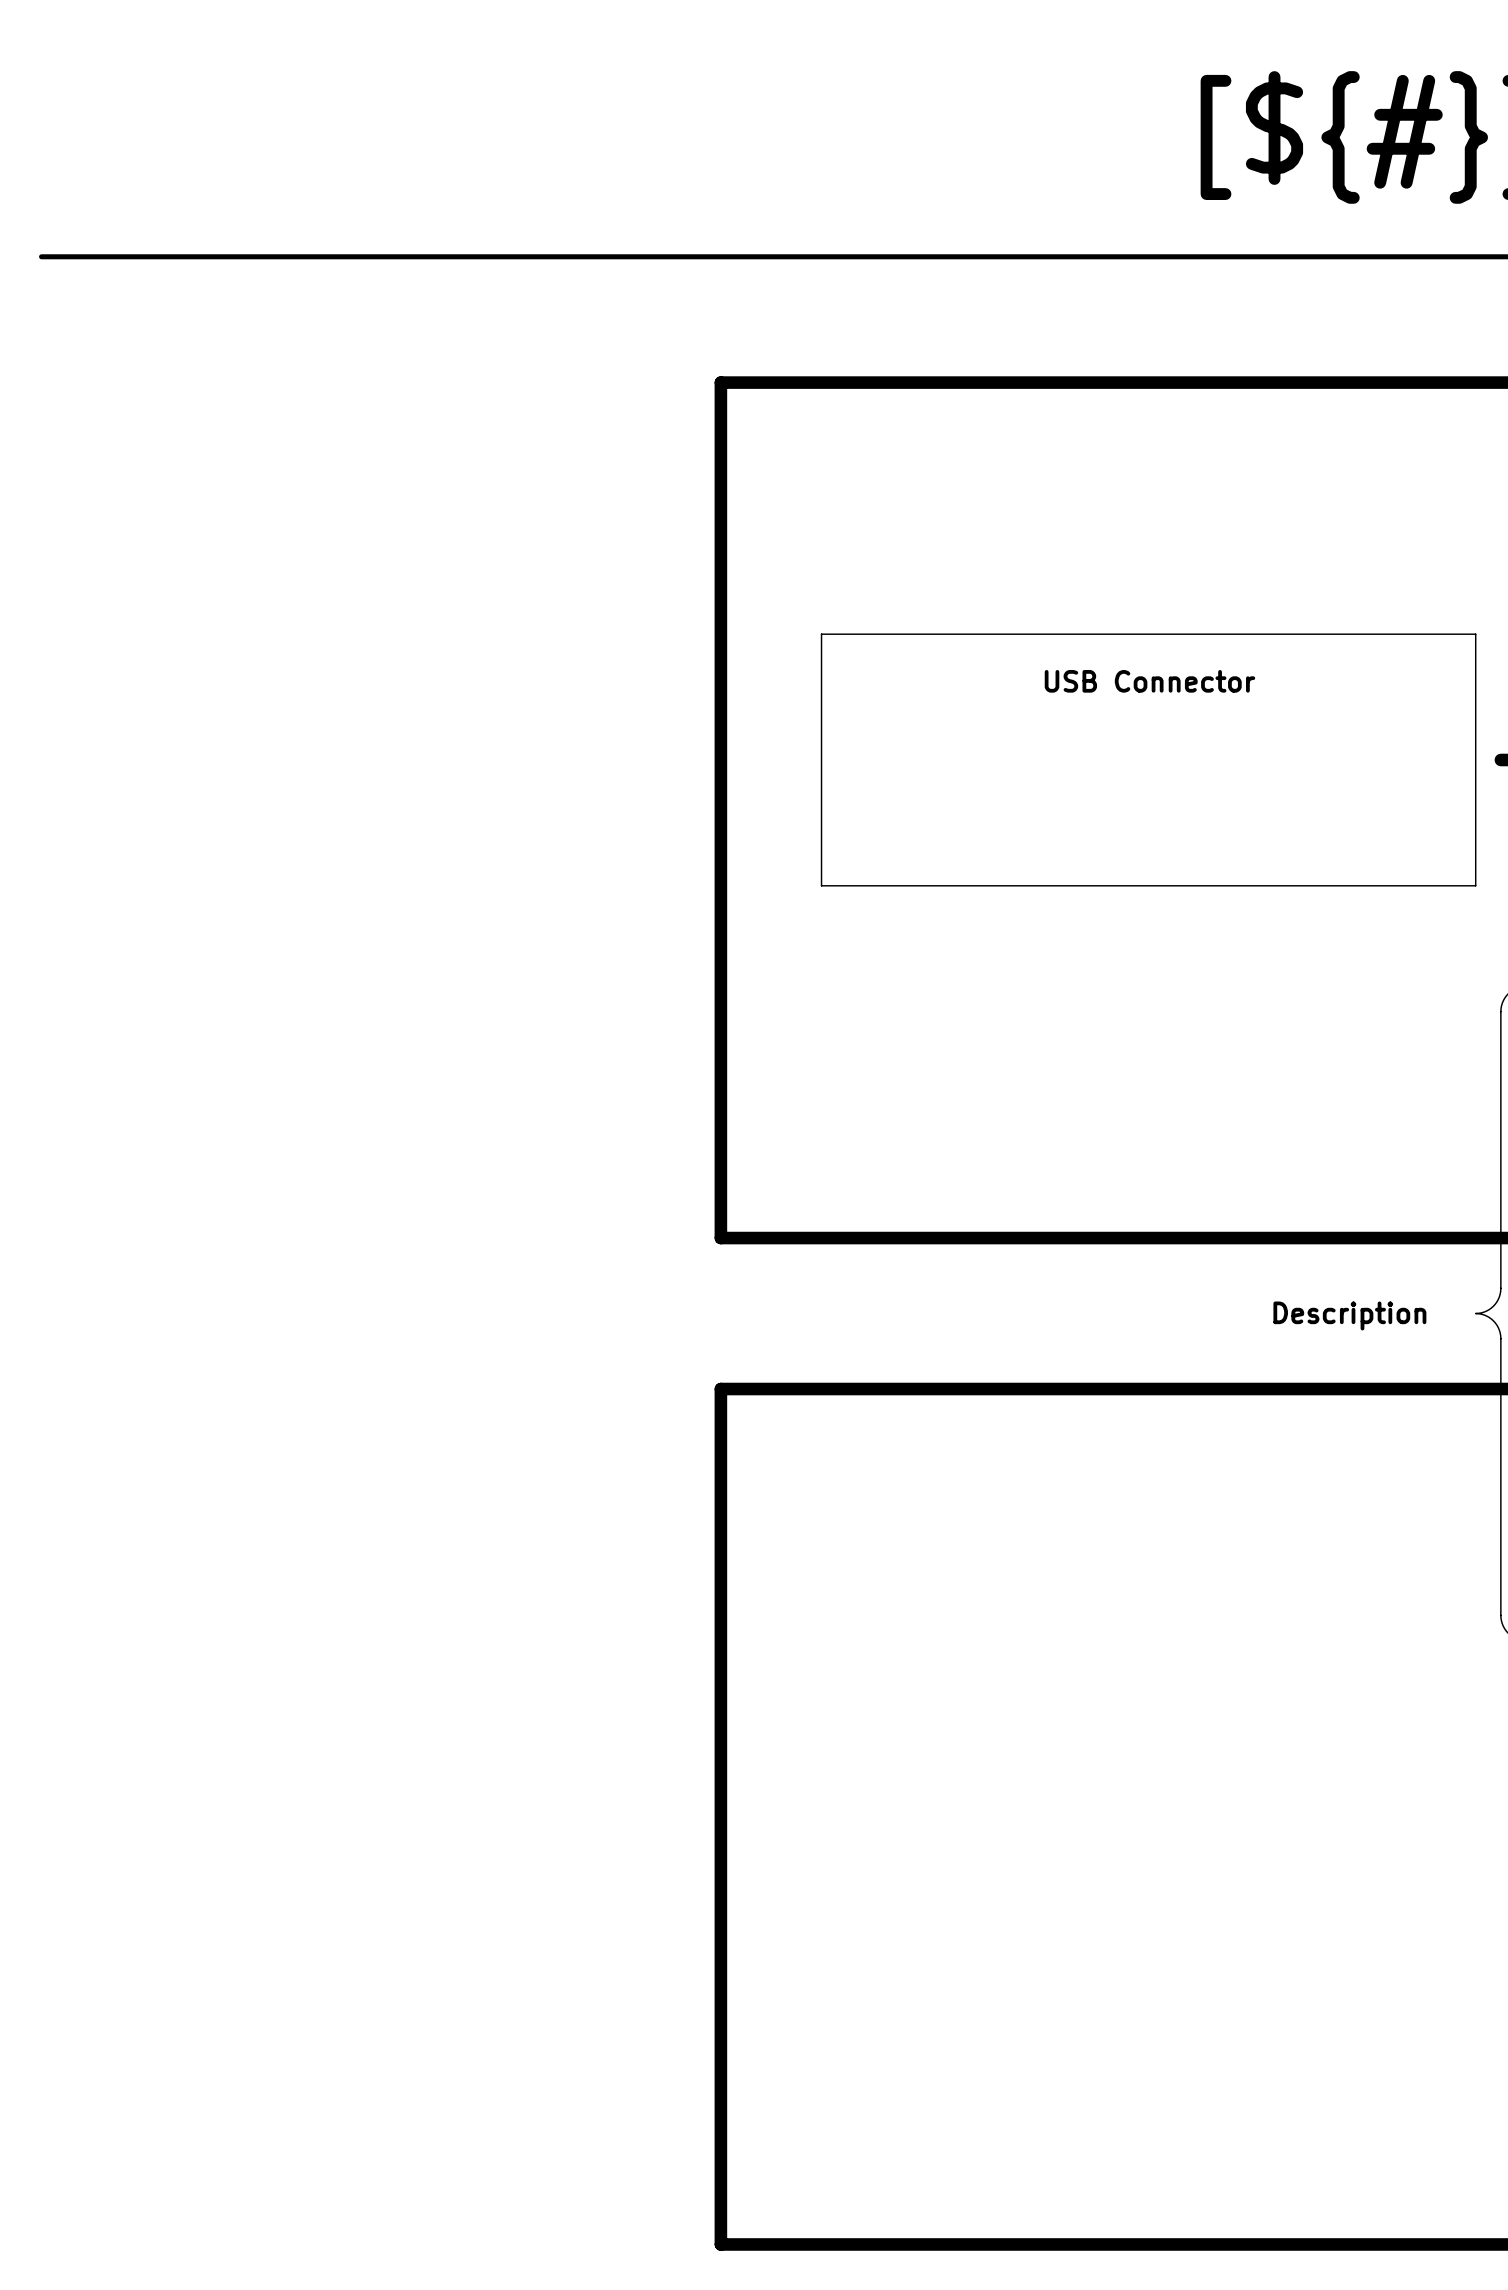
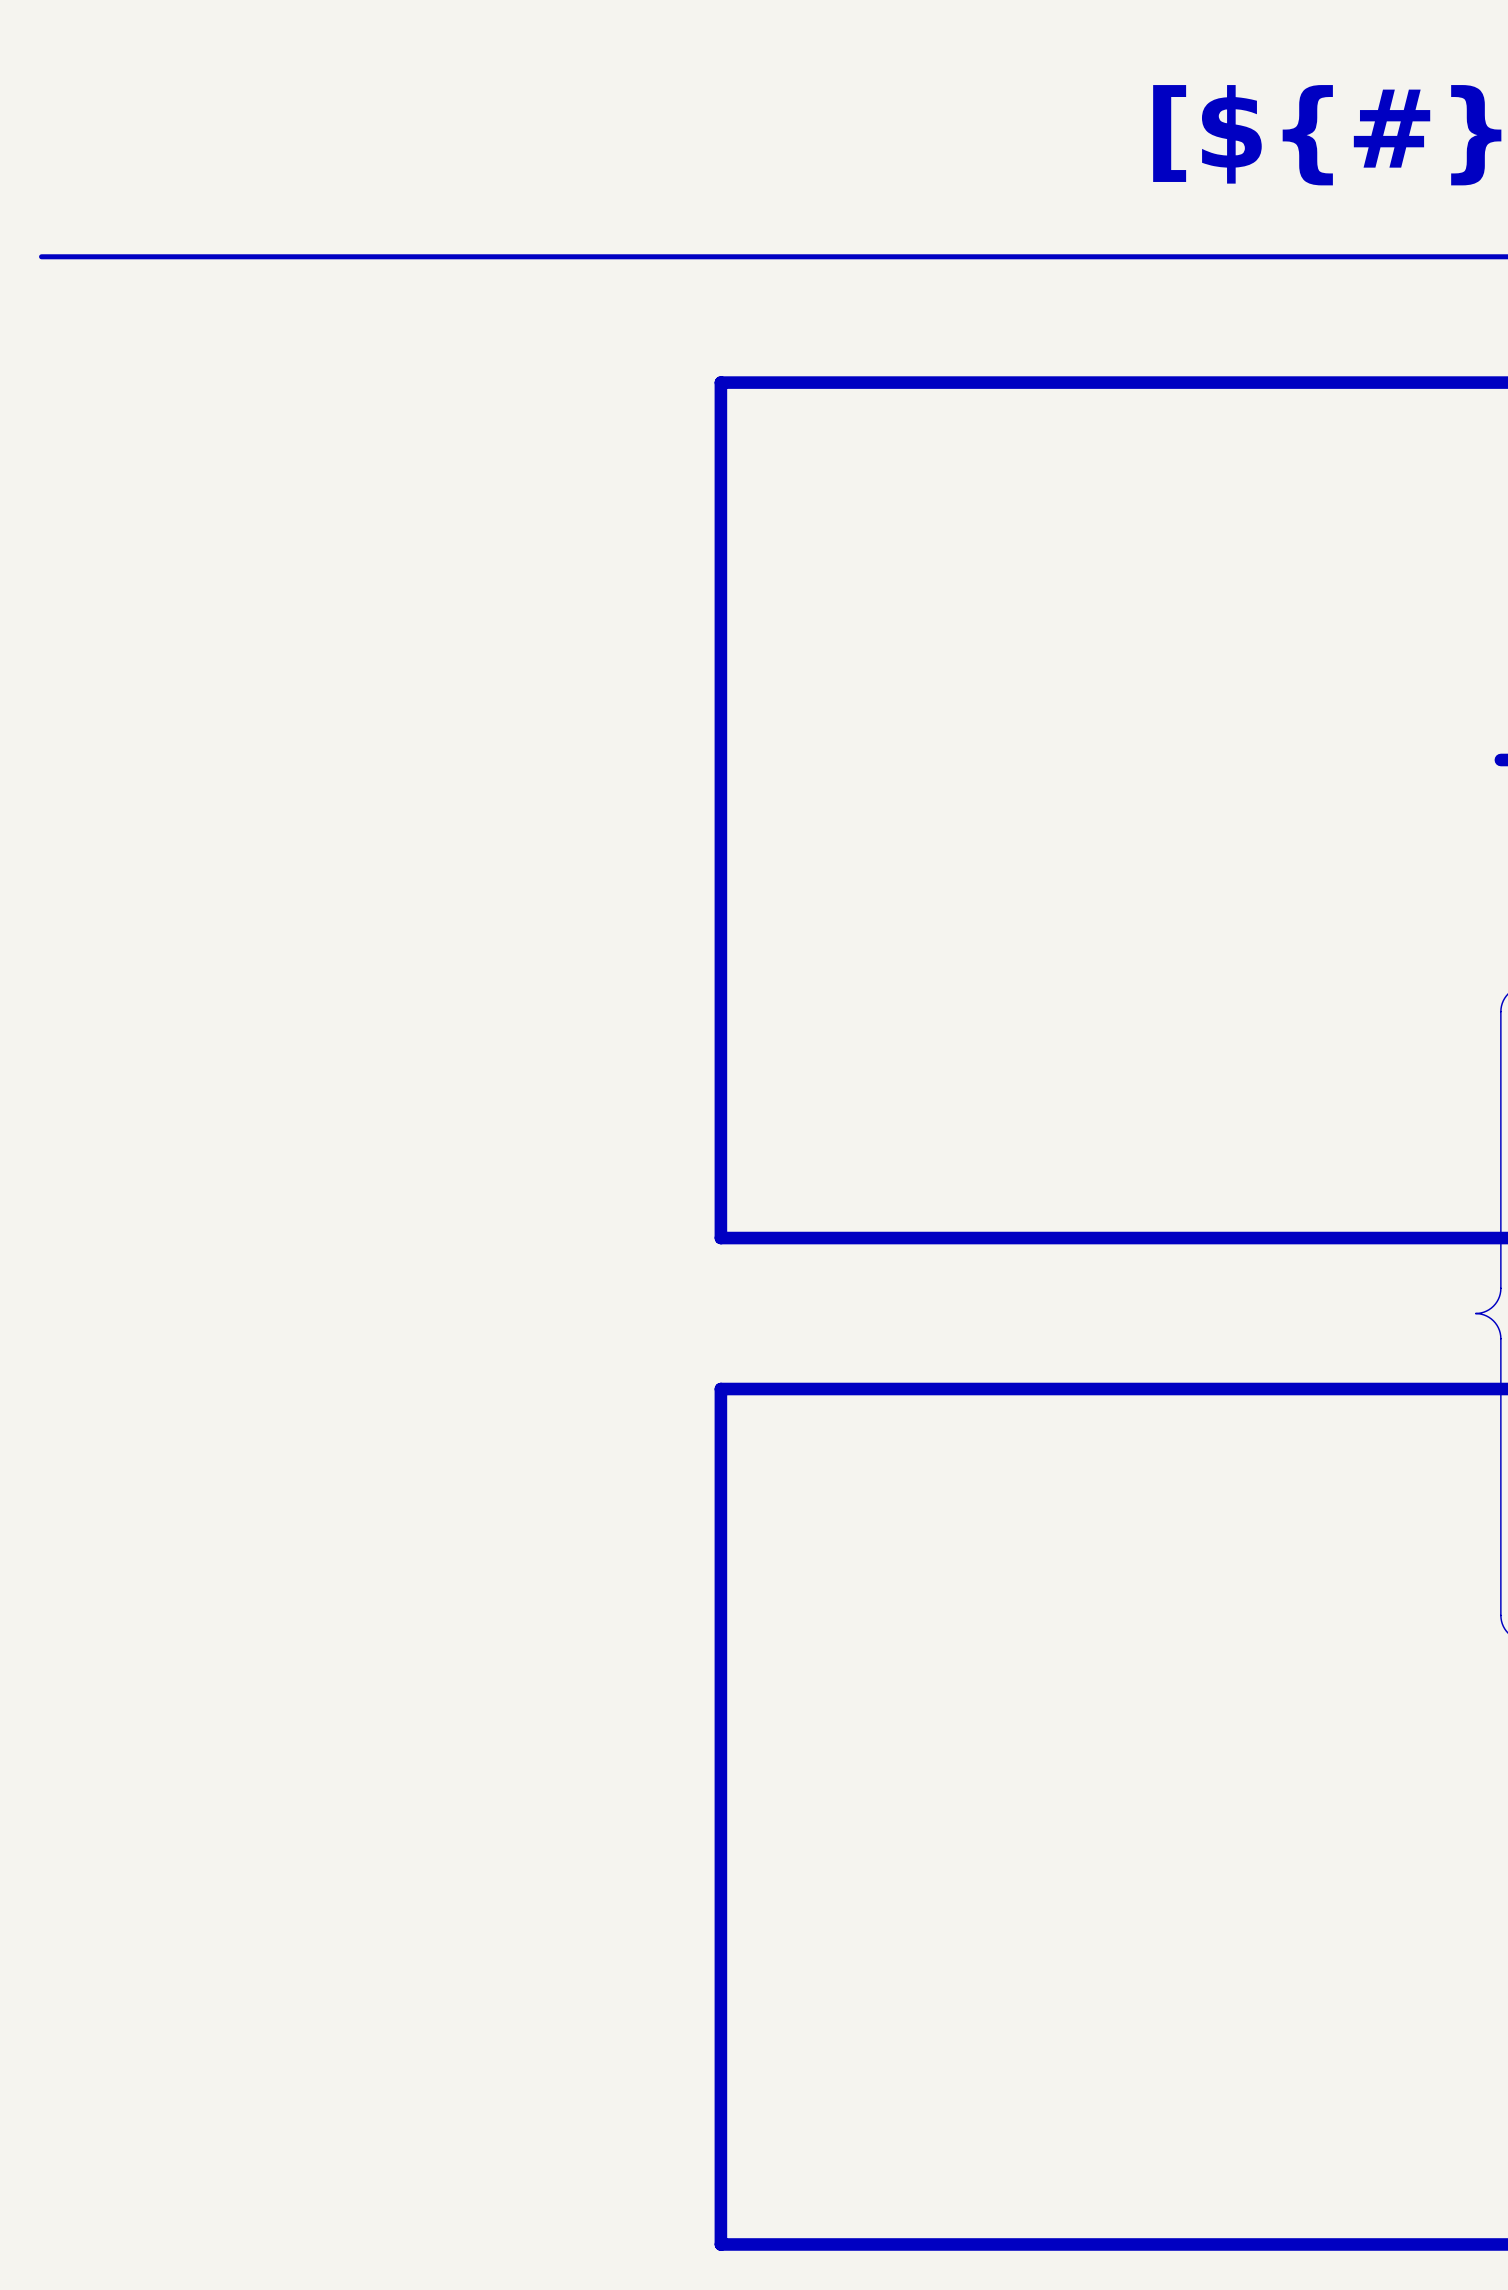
line: (821, 634) (1475, 634) (1475, 885) (821, 885) (821, 634) -> none
text: USB Connector (1149, 681) -> none
text: Description (1349, 1315) -> none

